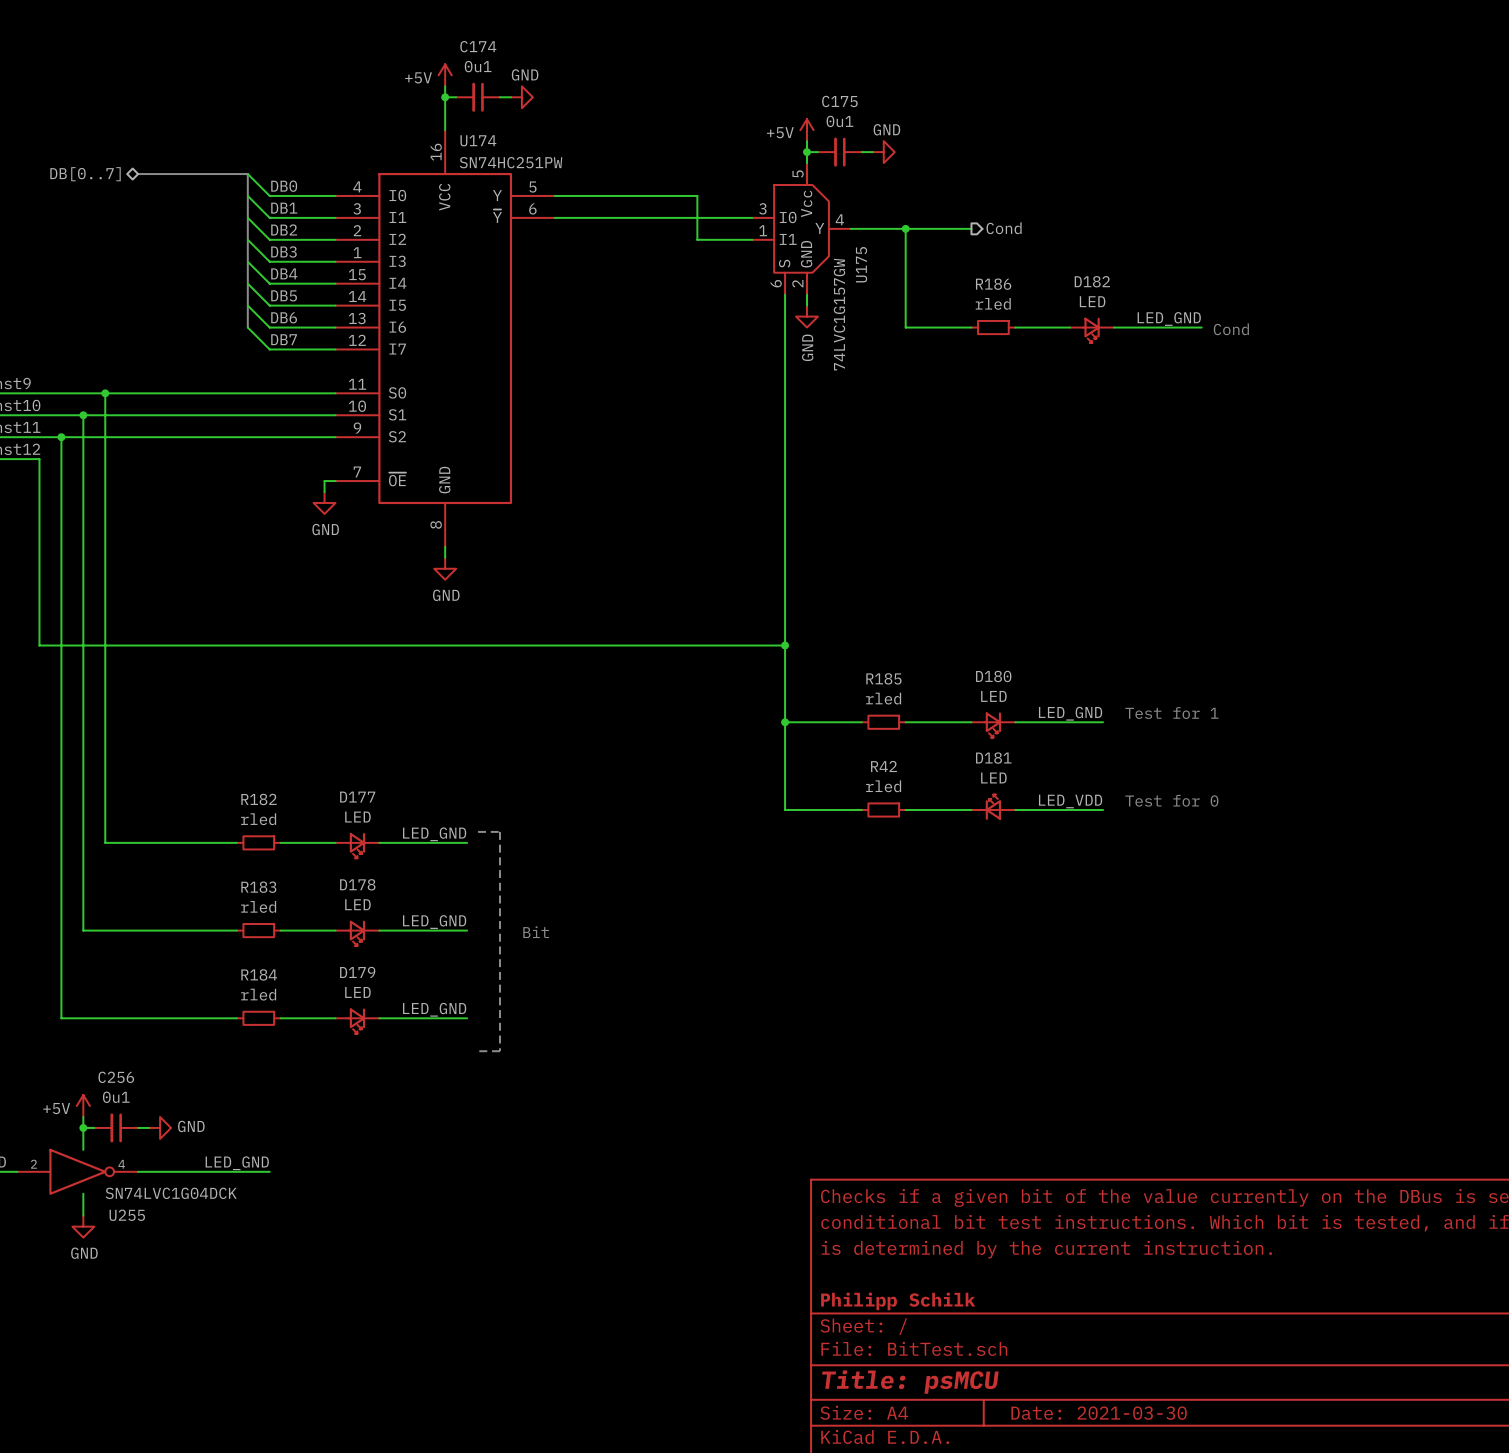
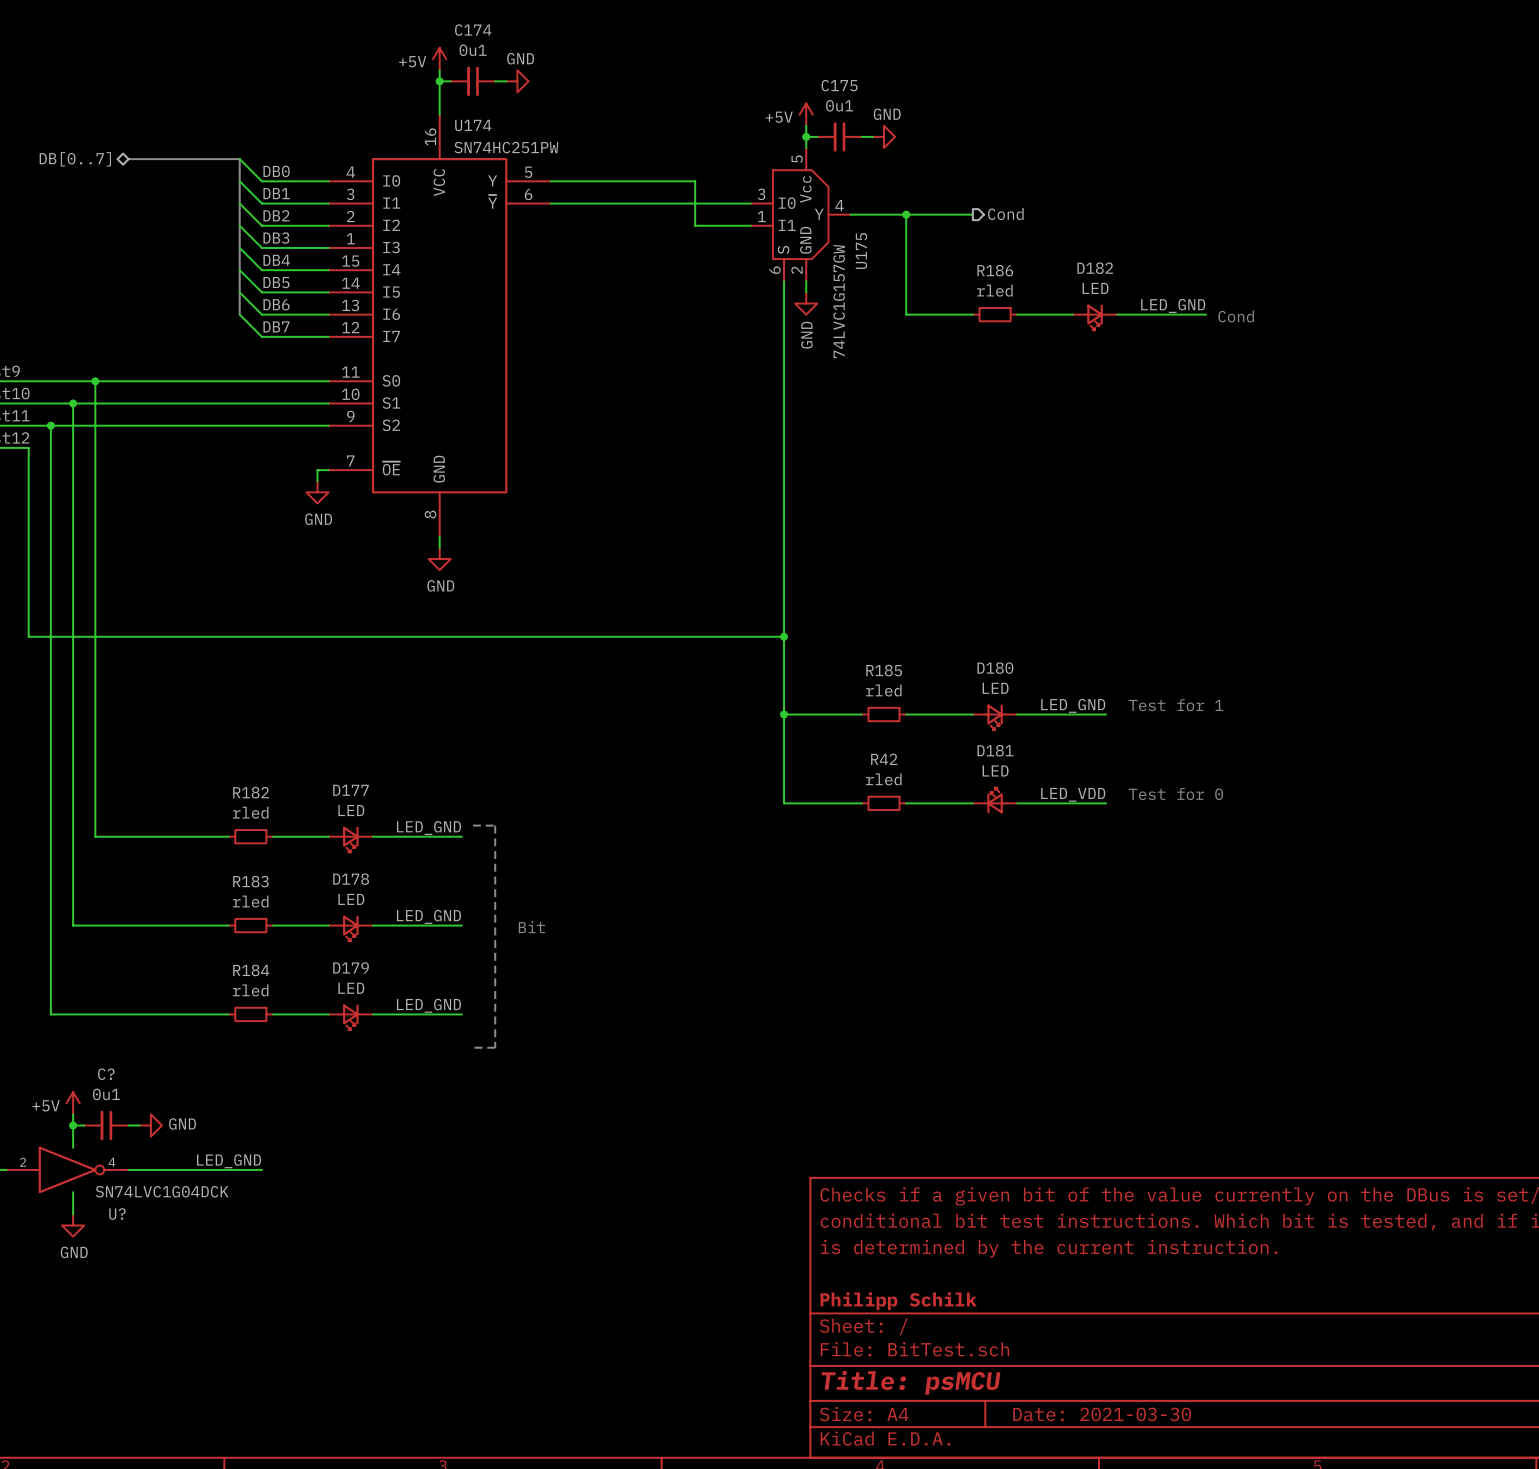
C256 name: C256 (116, 1077) -> C? (106, 1074)
U255 name: U255 (127, 1215) -> U? (117, 1213)

